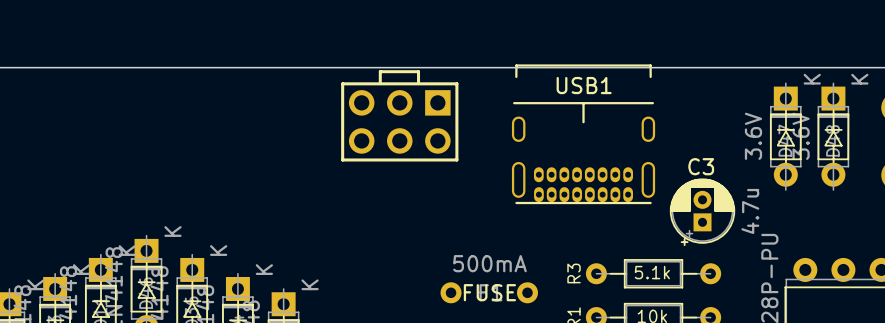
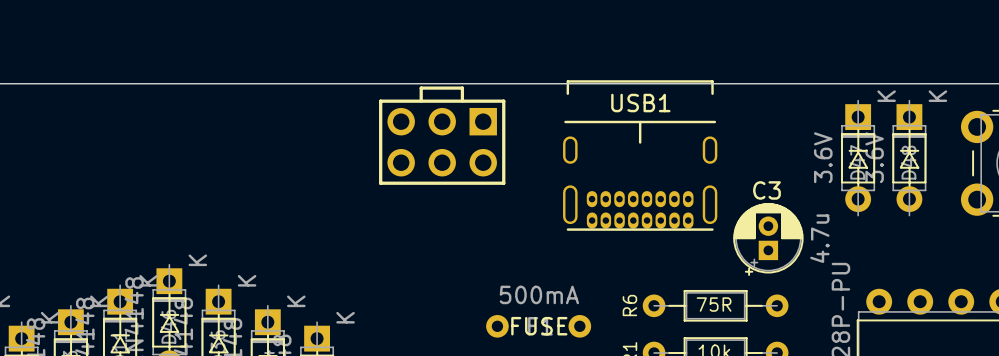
R3 value: 5.1k (652, 272) -> 75R (714, 304)
R3 name: R3 (574, 273) -> R6 (629, 305)

